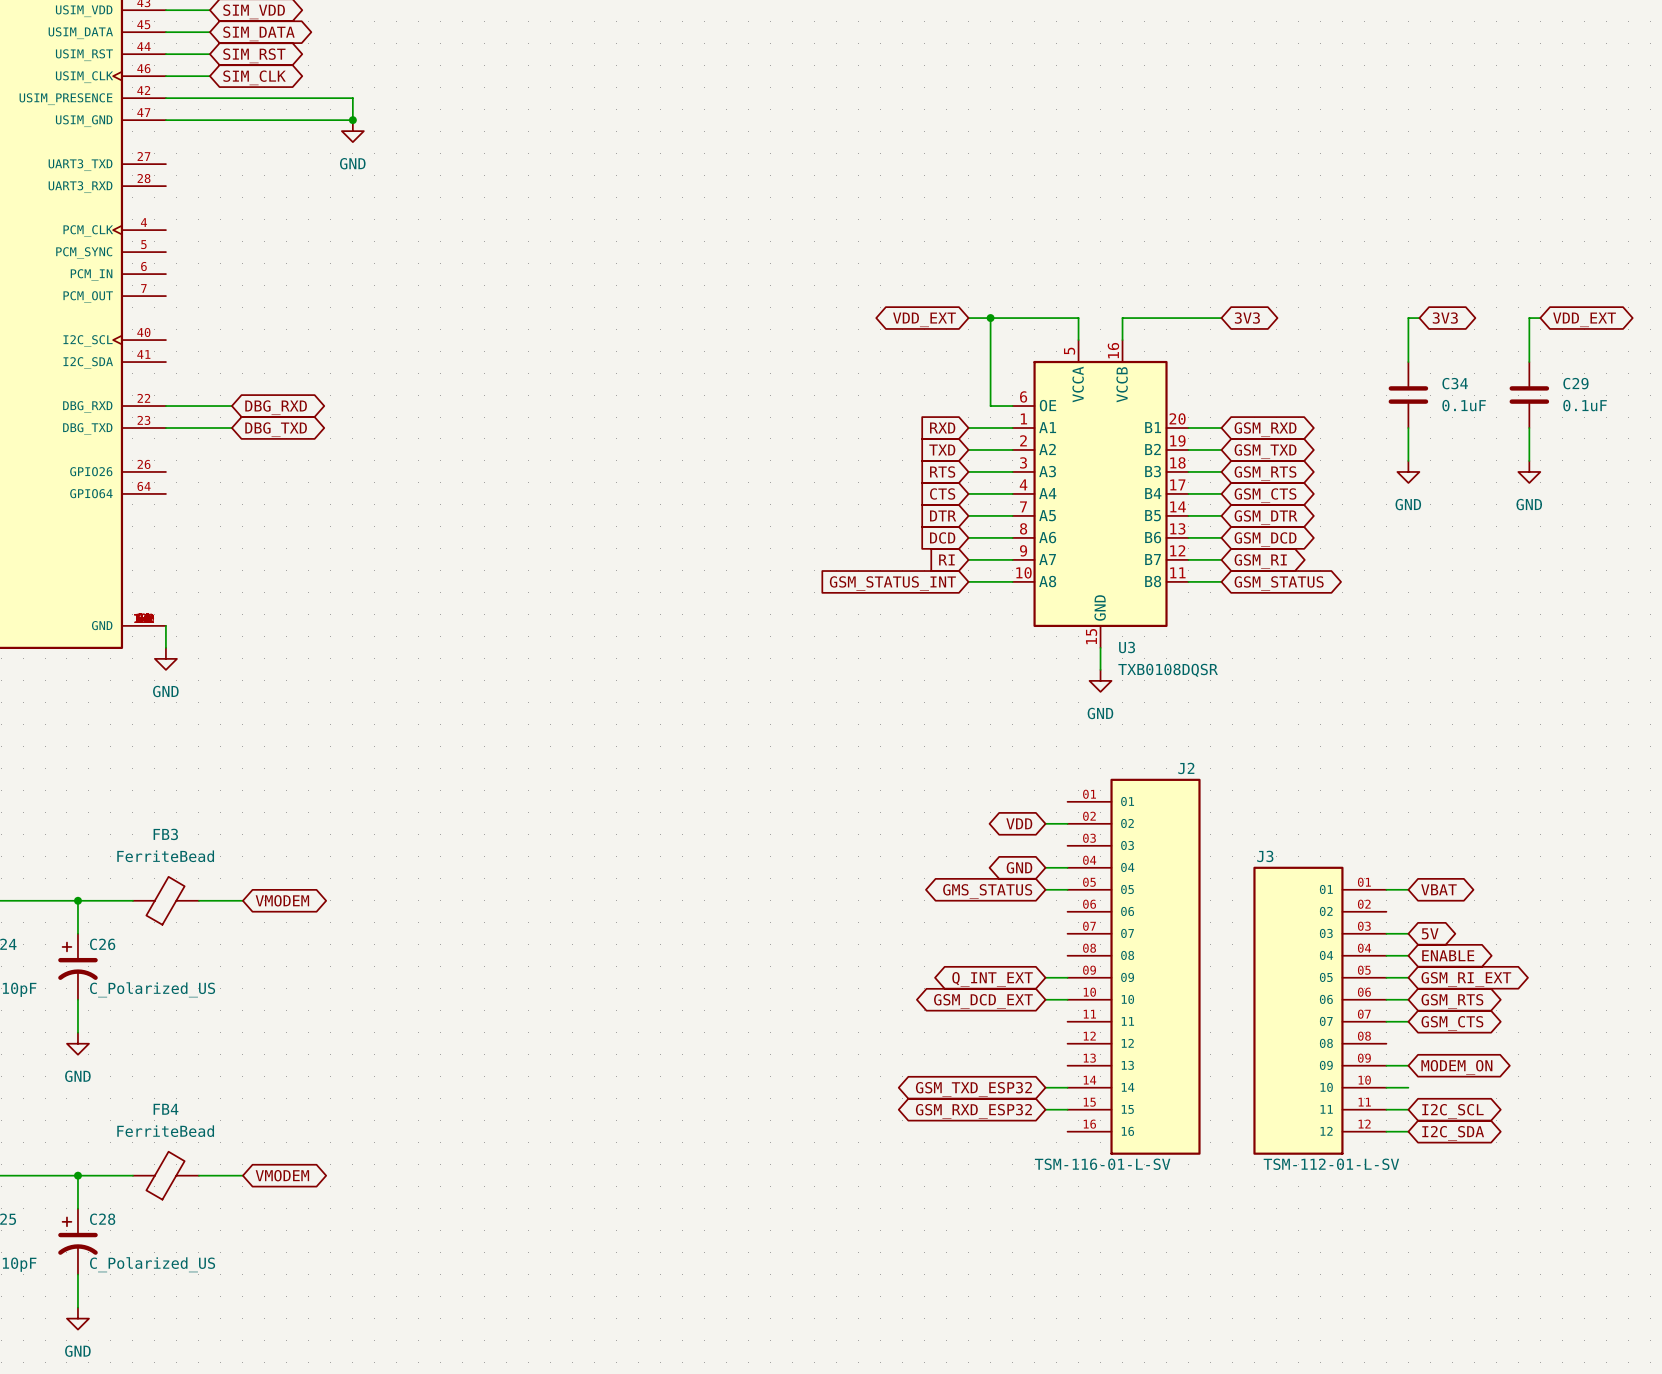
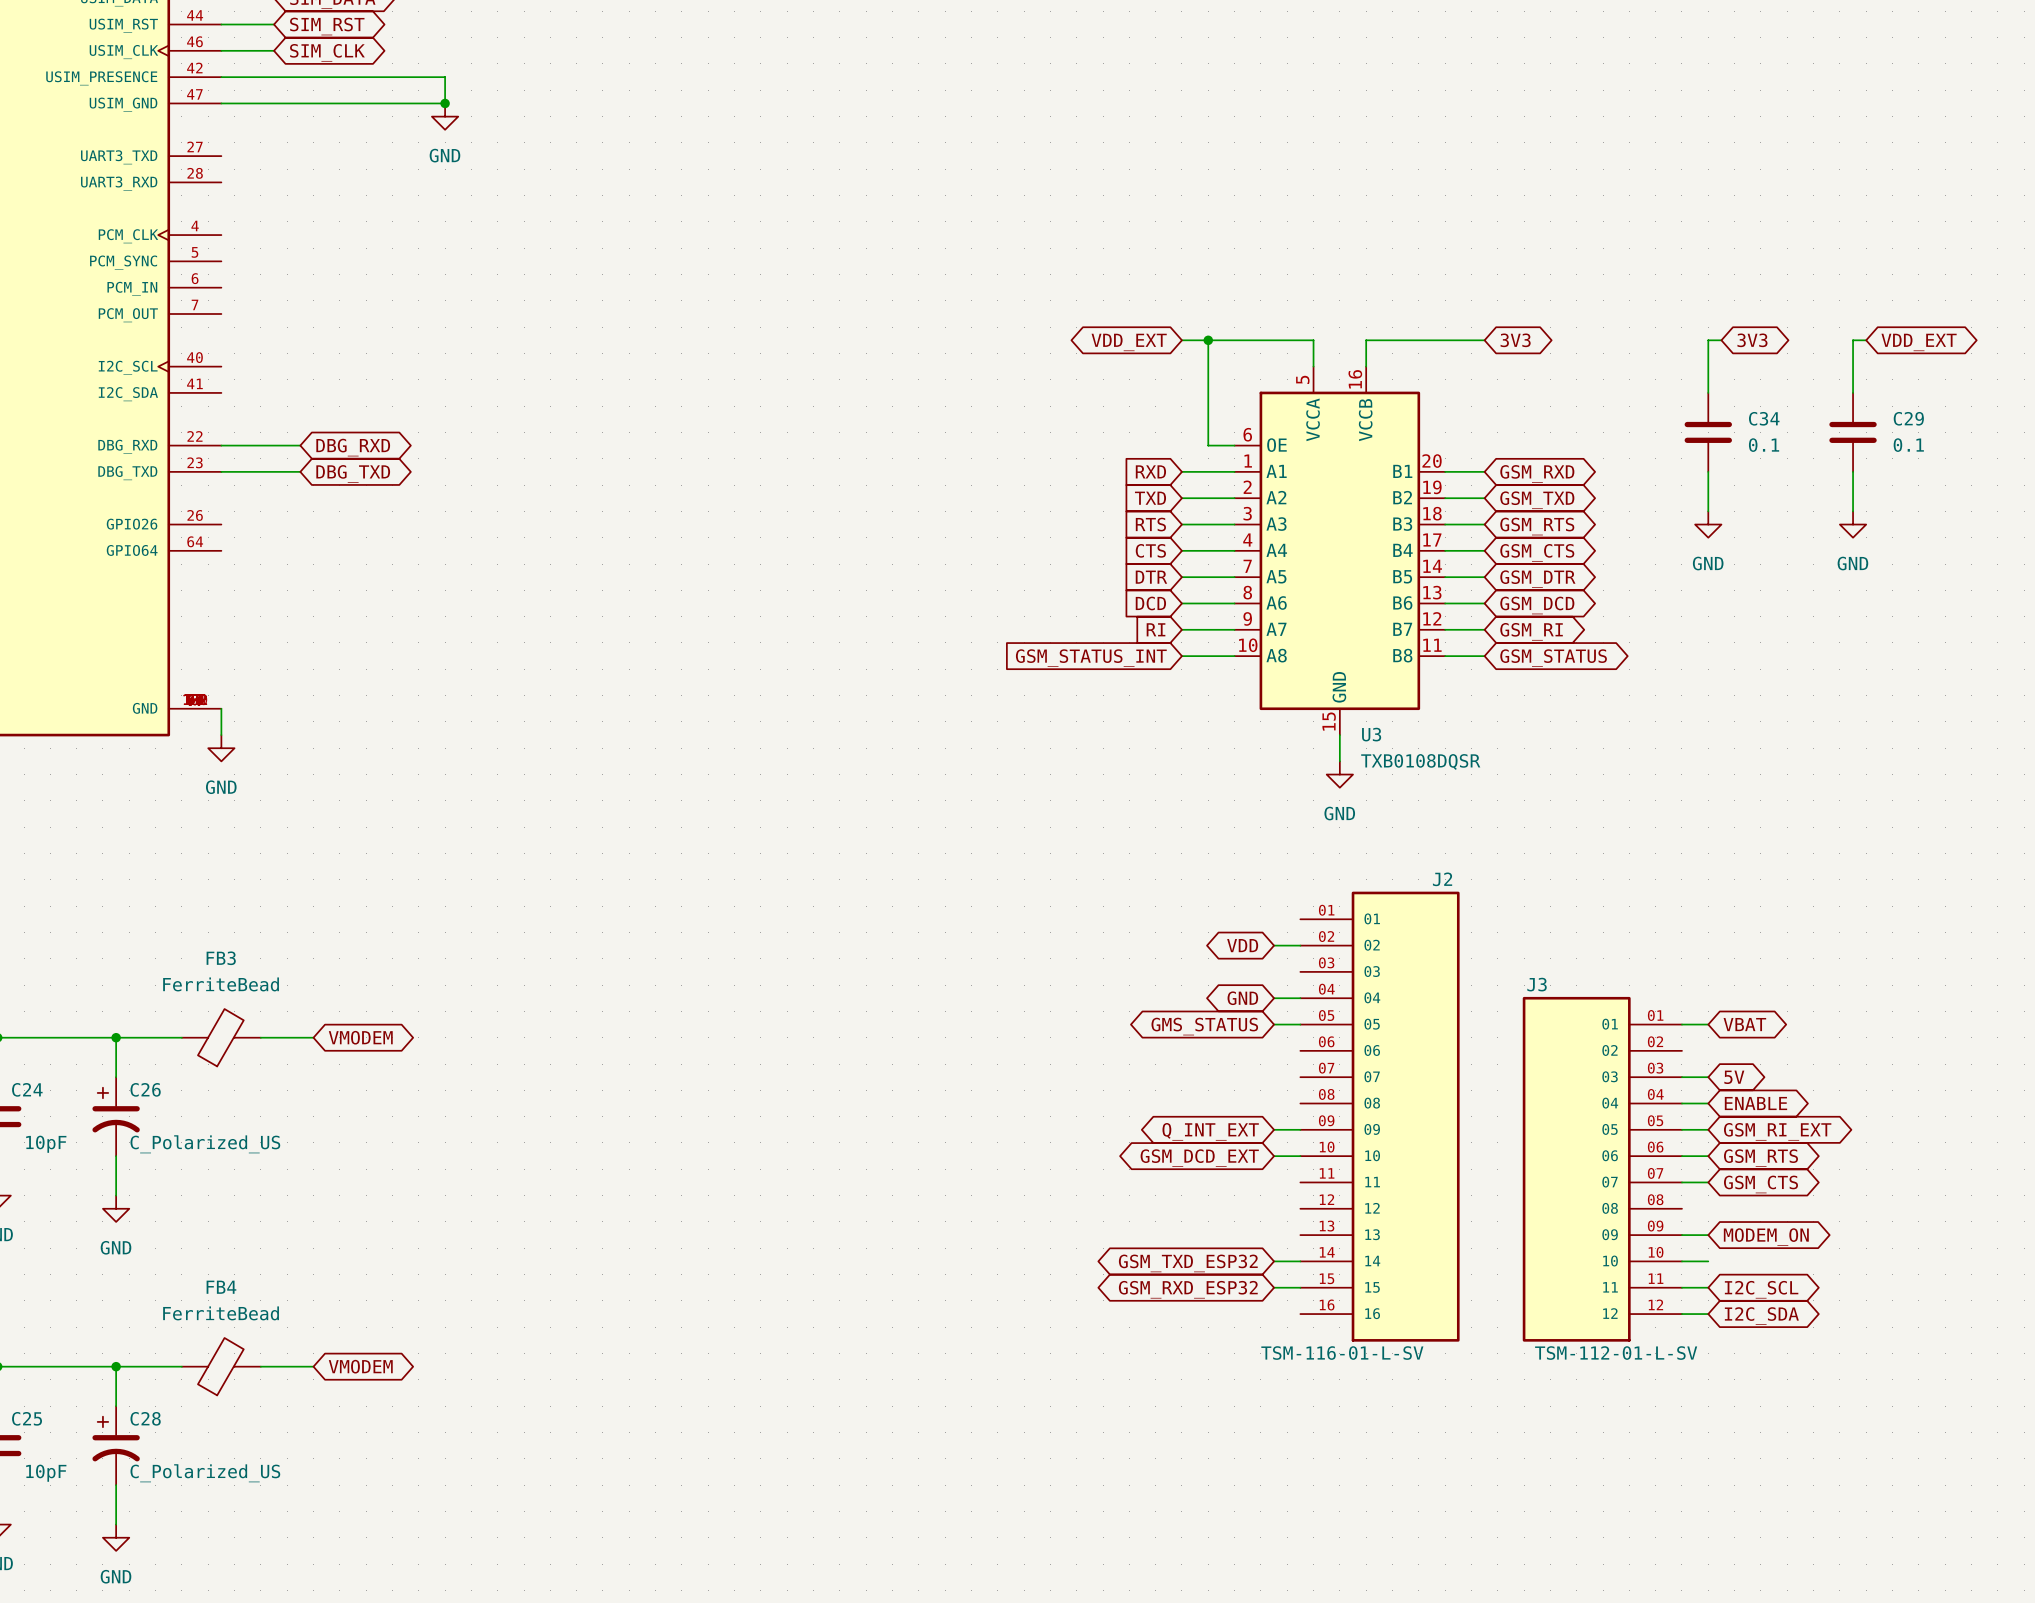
C34 value: 0.1uF (1464, 405) -> 0.1 (1764, 445)
C29 value: 0.1uF (1585, 405) -> 0.1 (1908, 445)

